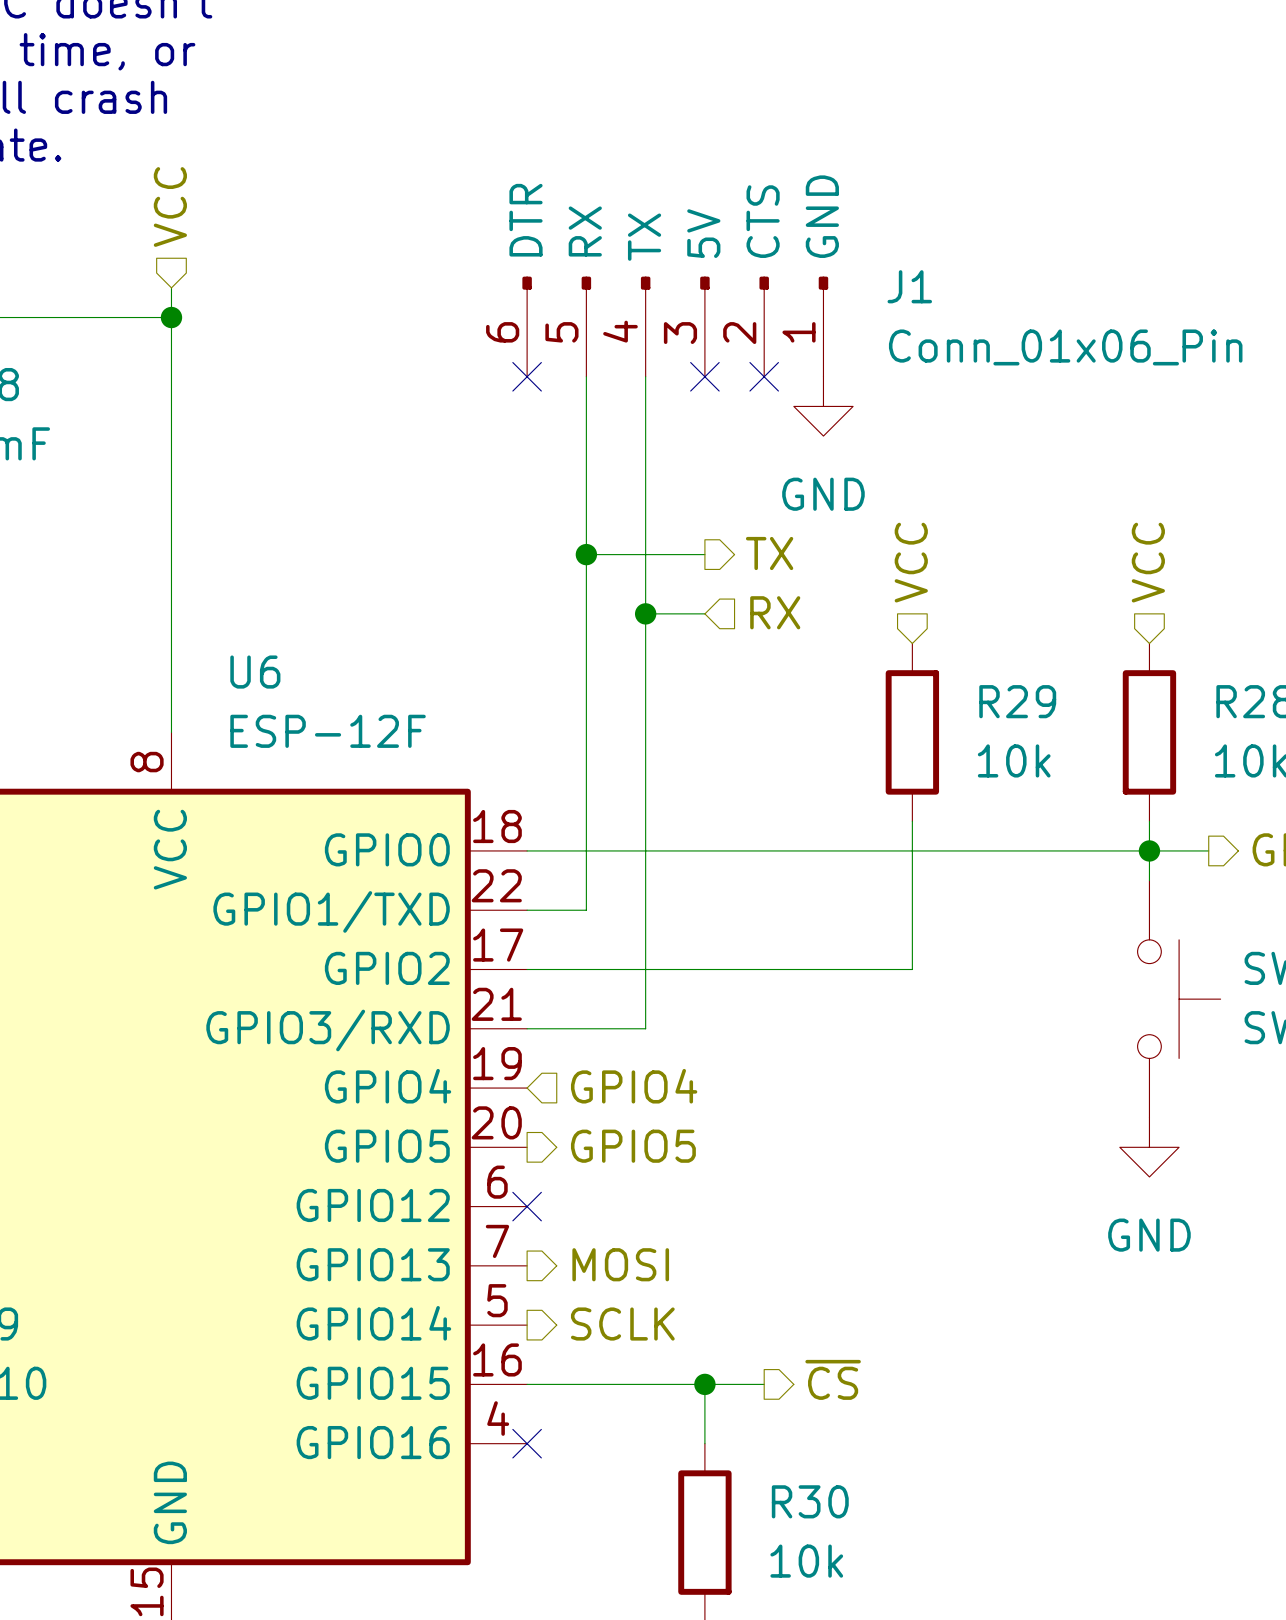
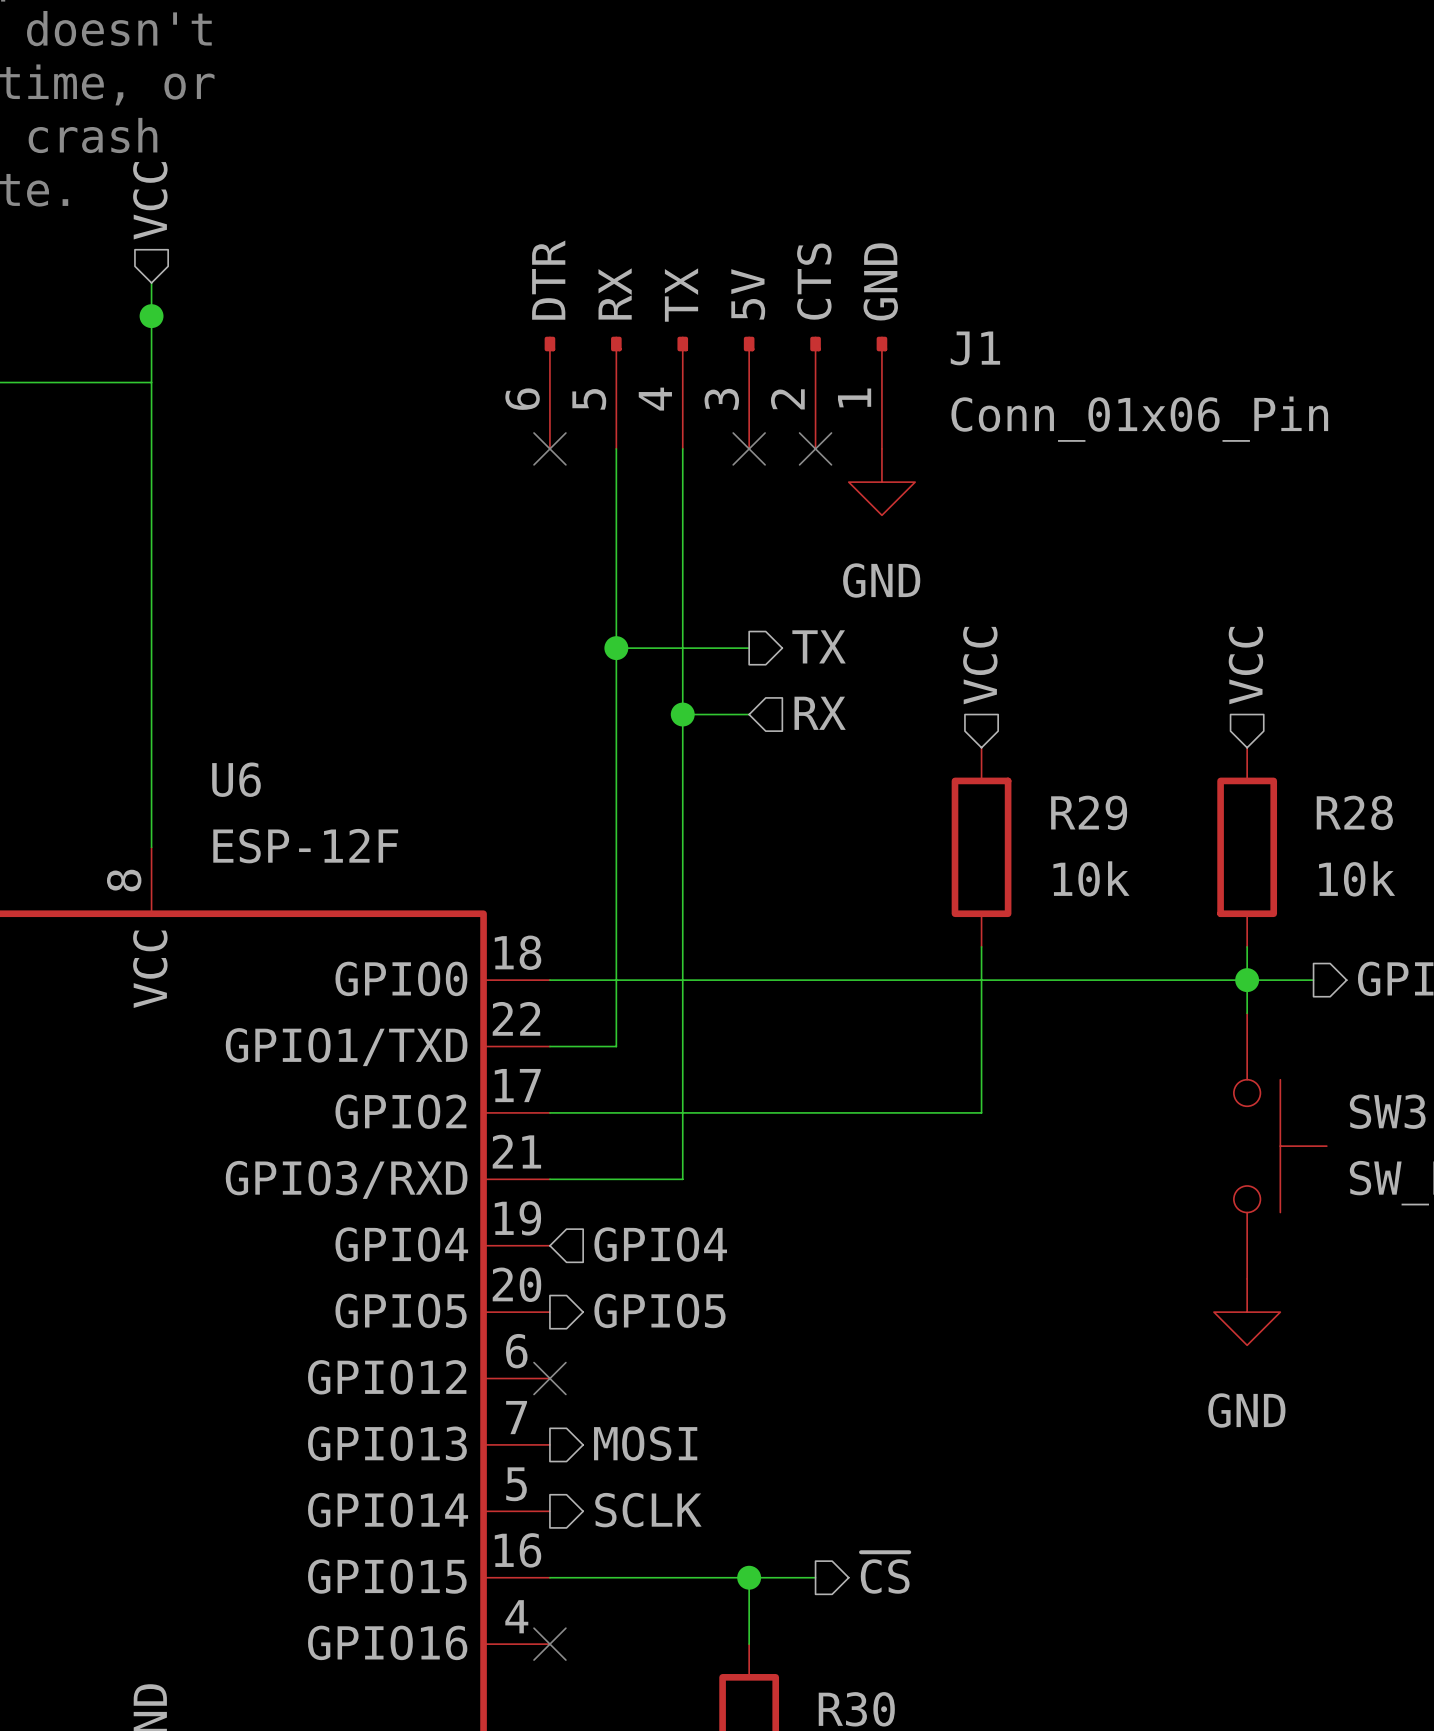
hierarchical label position: VCC (170, 206) -> VCC (150, 200)
wire: none -> (151, 282) (151, 349)
junction position: (171, 317) -> (151, 316)

